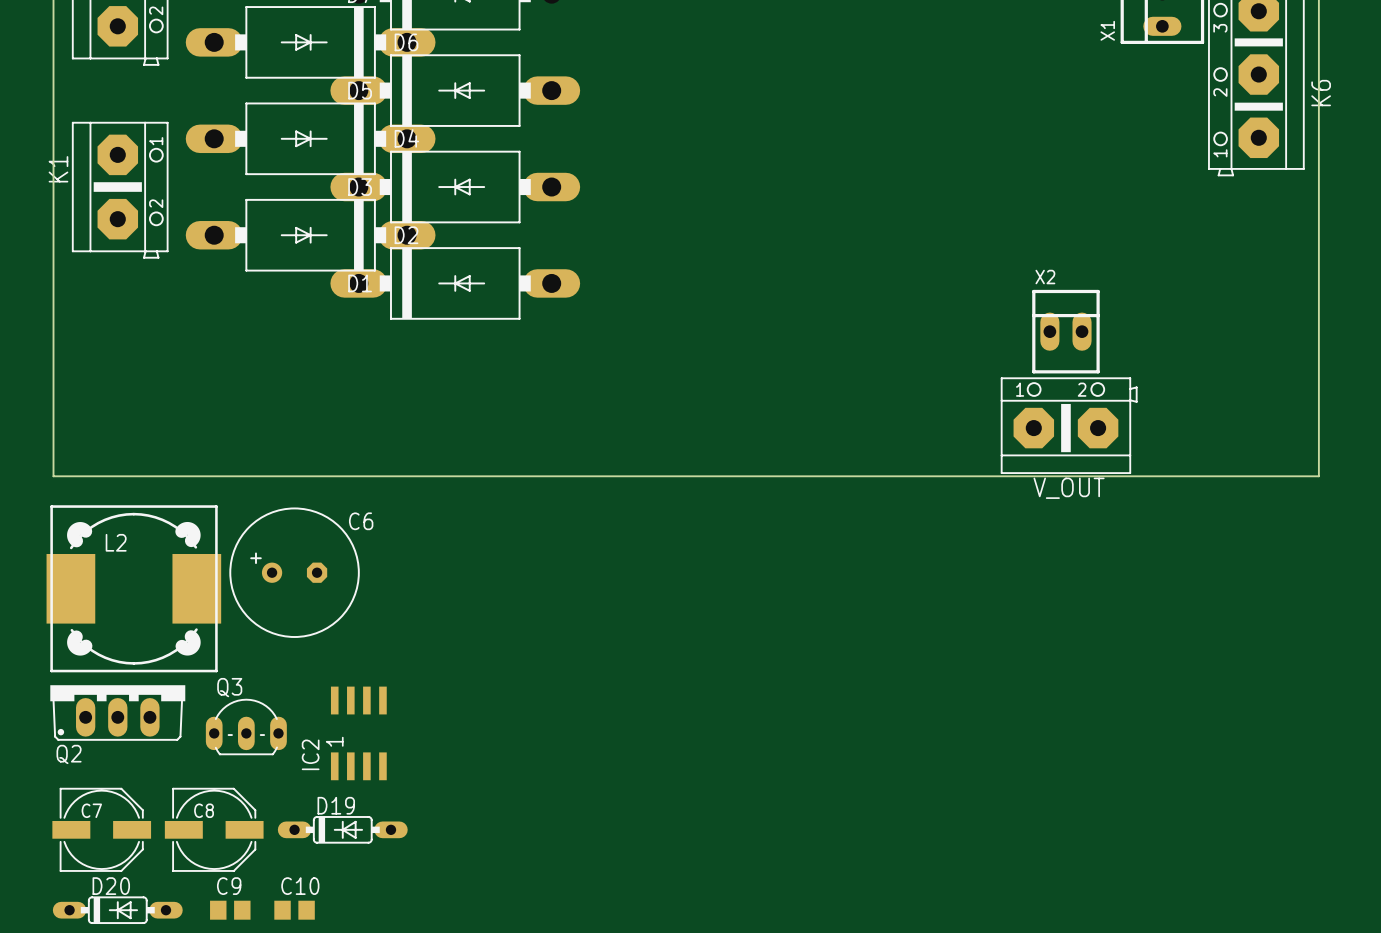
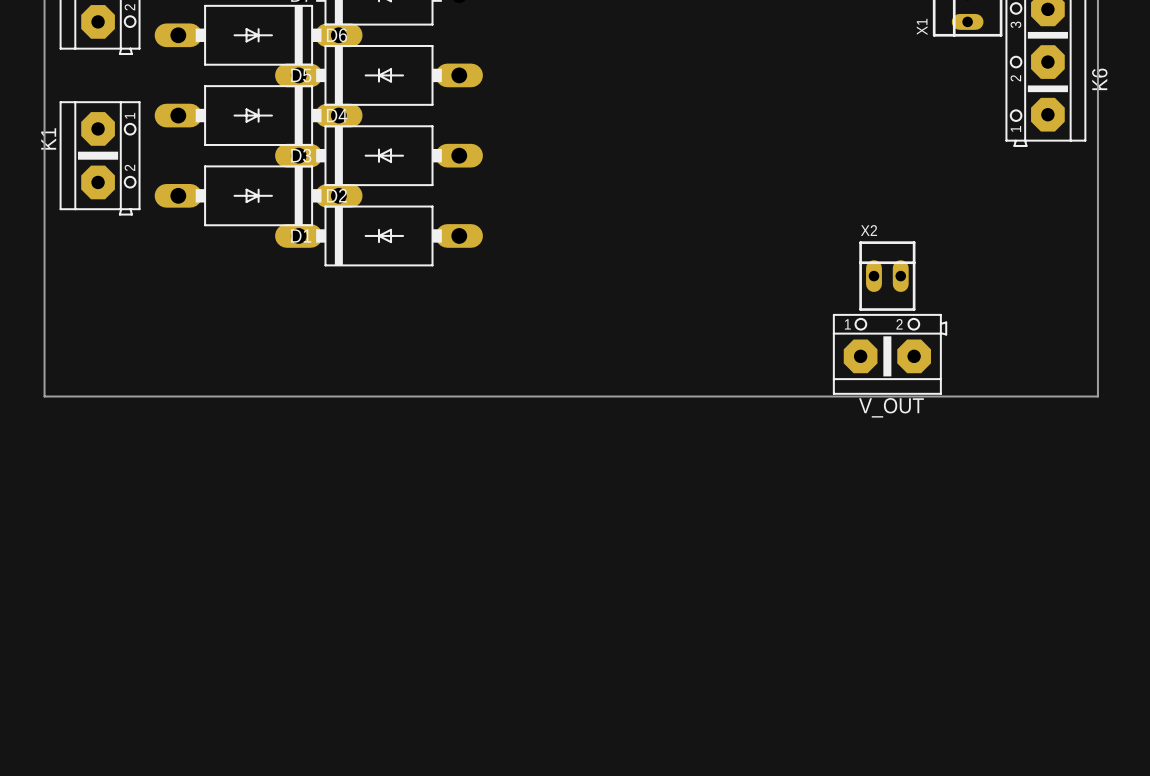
C6: (294, 572) -> none
L2: (133, 588) -> none
Q2: (117, 713) -> none
Q3: (246, 726) -> none
IC2: (358, 733) -> none
C7: (101, 829) -> none
C8: (214, 829) -> none
D19: (342, 829) -> none
D20: (117, 910) -> none
C9: (230, 910) -> none
C10: (294, 910) -> none

